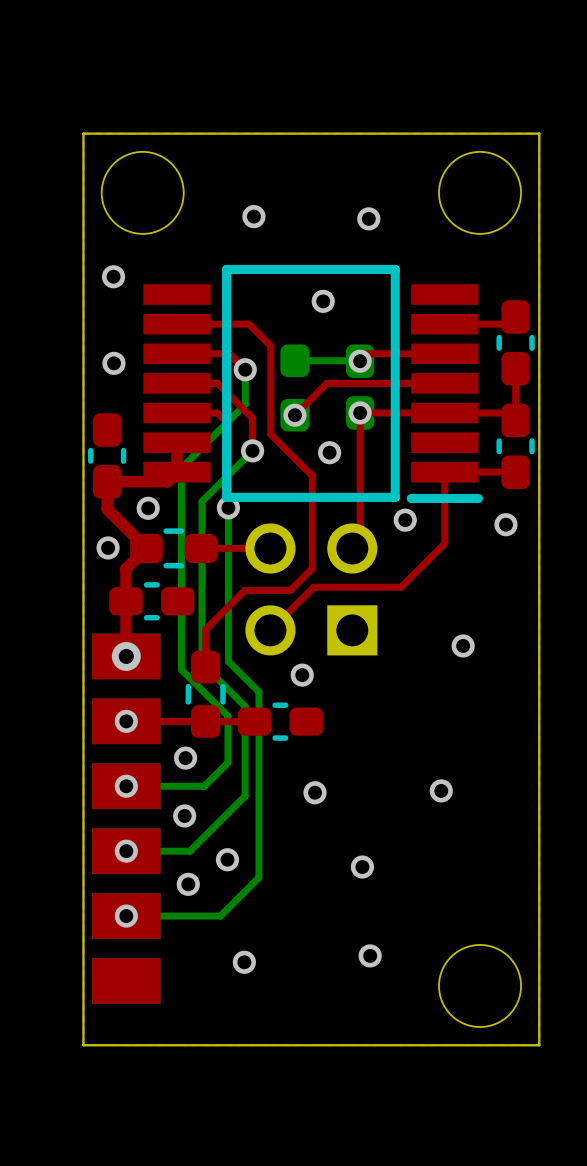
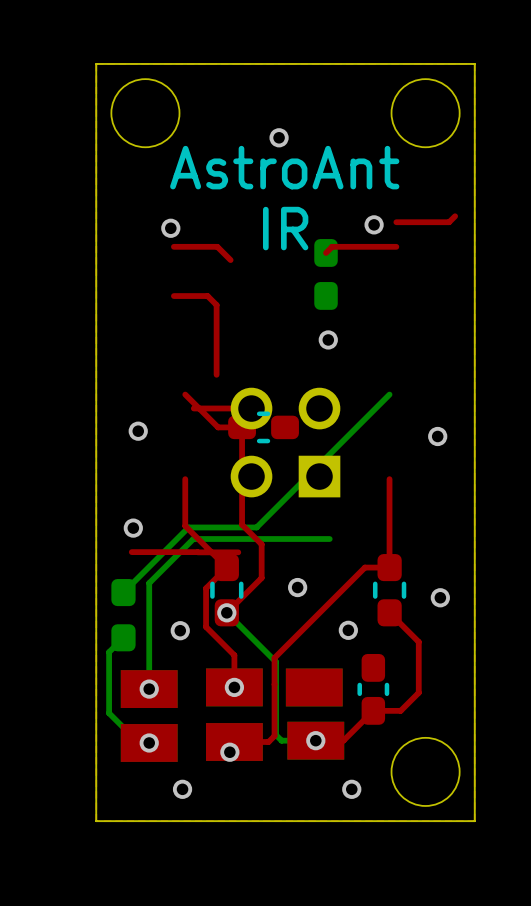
via: (253, 216) -> none
via: (368, 218) -> none
via: none -> (279, 137)
text: none -> AstroAnt (284, 167)
via: (113, 276) -> none
via: (323, 301) -> none
top track: (177, 324) (248, 324) (270, 346) (270, 434) (312, 475) (312, 568) (290, 590) (244, 590) (205, 629) (205, 667) -> none
via: none -> (374, 224)
via: none -> (170, 228)
text: none -> IR (285, 228)
part: (515, 342) -> none
bottom track: (294, 360) (359, 360) -> none
via: (360, 361) -> none
via: (114, 363) -> none
top track: (515, 368) (515, 420) (508, 413) (360, 413) (360, 540) (352, 548) -> none
bottom track: (245, 369) (245, 404) (181, 468) (181, 669) (227, 716) (227, 762) (204, 786) (126, 786) -> none
via: (245, 369) -> none
top track: (177, 383) (217, 383) (252, 418) (252, 450) -> none
part: (313, 383) -> none
top track: (444, 383) (326, 383) (294, 415) -> none
part position: (294, 387) -> (123, 615)
via: (360, 412) -> none
via: (294, 415) -> none
top track: (177, 442) (177, 472) (167, 481) (107, 481) (107, 509) (146, 548) (125, 568) (125, 656) -> none
part: (515, 446) -> none
bottom track: (252, 450) (201, 501) (201, 663) (245, 706) (245, 796) (190, 851) (126, 851) -> none
via: (252, 450) -> none
via: (329, 452) -> none
part: (107, 455) -> none
via: none -> (328, 339)
top track: (515, 472) (444, 472) (444, 543) (401, 587) (313, 587) (270, 630) -> none
bottom track: (228, 507) (228, 661) (258, 691) (258, 877) (220, 916) (126, 916) -> none
via: (228, 507) -> none
via: (148, 508) -> none
via: (405, 520) -> none
via: (506, 524) -> none
top track: none -> (185, 394) (218, 427) (242, 427) (242, 524) (261, 544) (261, 577) (226, 612)
bottom track: none -> (389, 394) (256, 527) (188, 527) (123, 592)
via: (108, 547) -> none
part: (173, 548) -> none
part: none -> (263, 427)
via: none -> (138, 431)
via: none -> (437, 436)
part: (151, 601) -> none
top track: none -> (185, 479) (185, 526) (226, 567) (206, 588) (206, 626) (234, 655) (234, 687)
top track: none -> (389, 479) (389, 567) (364, 567) (274, 657) (274, 736) (268, 742) (234, 742)
via: (463, 645) -> none
part: (126, 656) -> none
via: (126, 656) -> none
via: (302, 675) -> none
part position: (205, 694) -> (226, 590)
bottom track: none -> (329, 539) (193, 539) (149, 583) (149, 689)
part: (126, 721) -> none
via position: (126, 721) -> (133, 528)
part: (280, 721) -> none
via: (185, 758) -> none
part: none -> (389, 590)
via: none -> (440, 597)
part: (126, 786) -> none
via: (126, 786) -> none
via: (441, 790) -> none
via position: (315, 792) -> (297, 587)
bottom track: none -> (226, 612) (276, 662) (276, 735) (281, 740) (315, 740)
via: none -> (226, 612)
top track: none -> (389, 612) (418, 641) (418, 692) (400, 710) (373, 710) (343, 740) (315, 740)
via: none -> (348, 630)
bottom track: none -> (123, 637) (109, 652) (109, 713) (138, 742) (149, 742)
part: (126, 851) -> none
via: (126, 851) -> none
via: (227, 859) -> none
via: (362, 867) -> none
via: (188, 884) -> none
part: none -> (234, 687)
via: none -> (234, 687)
part: none -> (314, 687)
part: none -> (149, 689)
via: none -> (149, 689)
part: none -> (373, 689)
part: (126, 916) -> none
via: (126, 916) -> none
part: none -> (315, 740)
part: none -> (234, 742)
part: none -> (149, 742)
via: none -> (149, 742)
via position: (370, 955) -> (315, 740)
part: (126, 980) -> none
via: none -> (182, 789)
via: none -> (351, 789)

